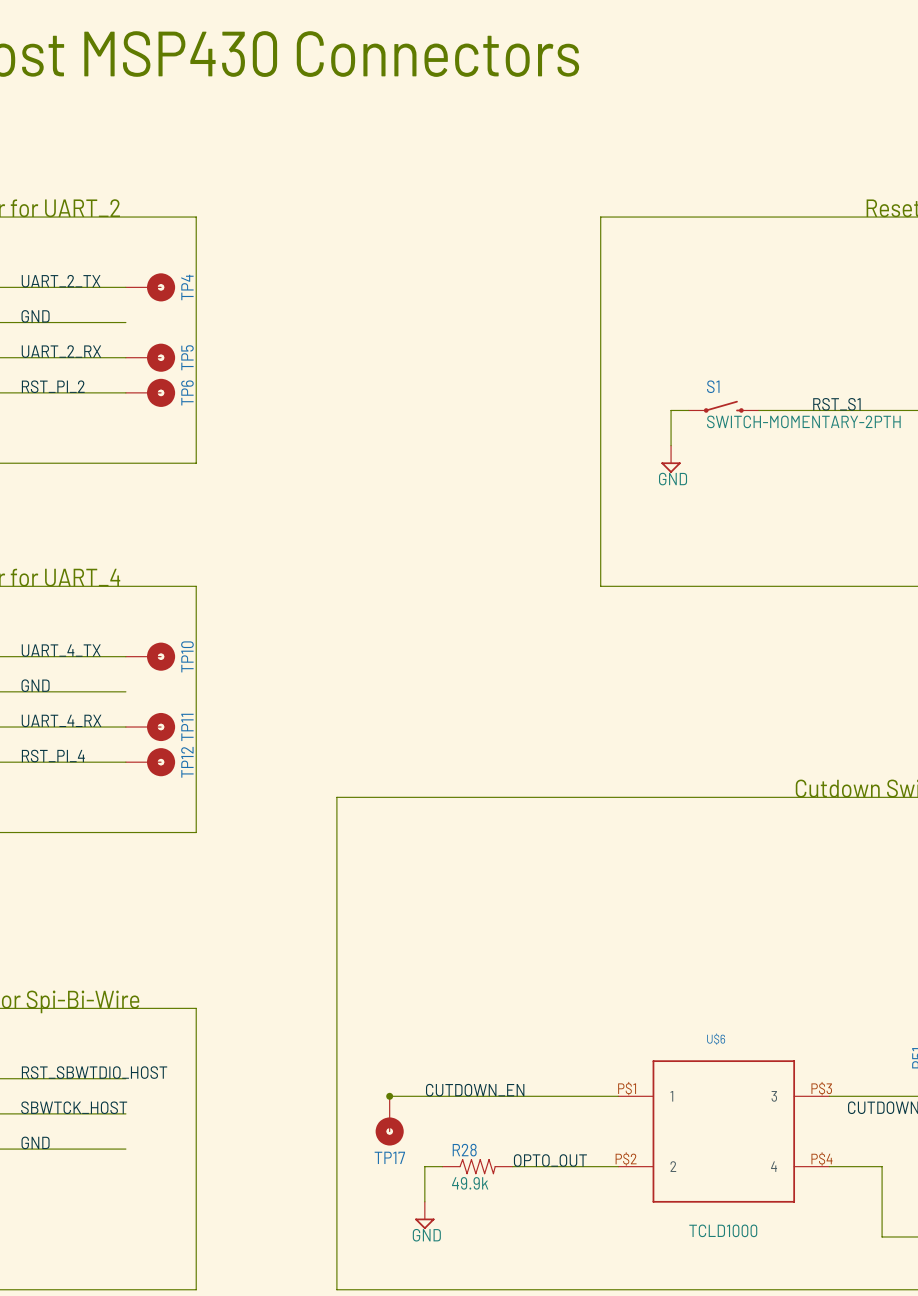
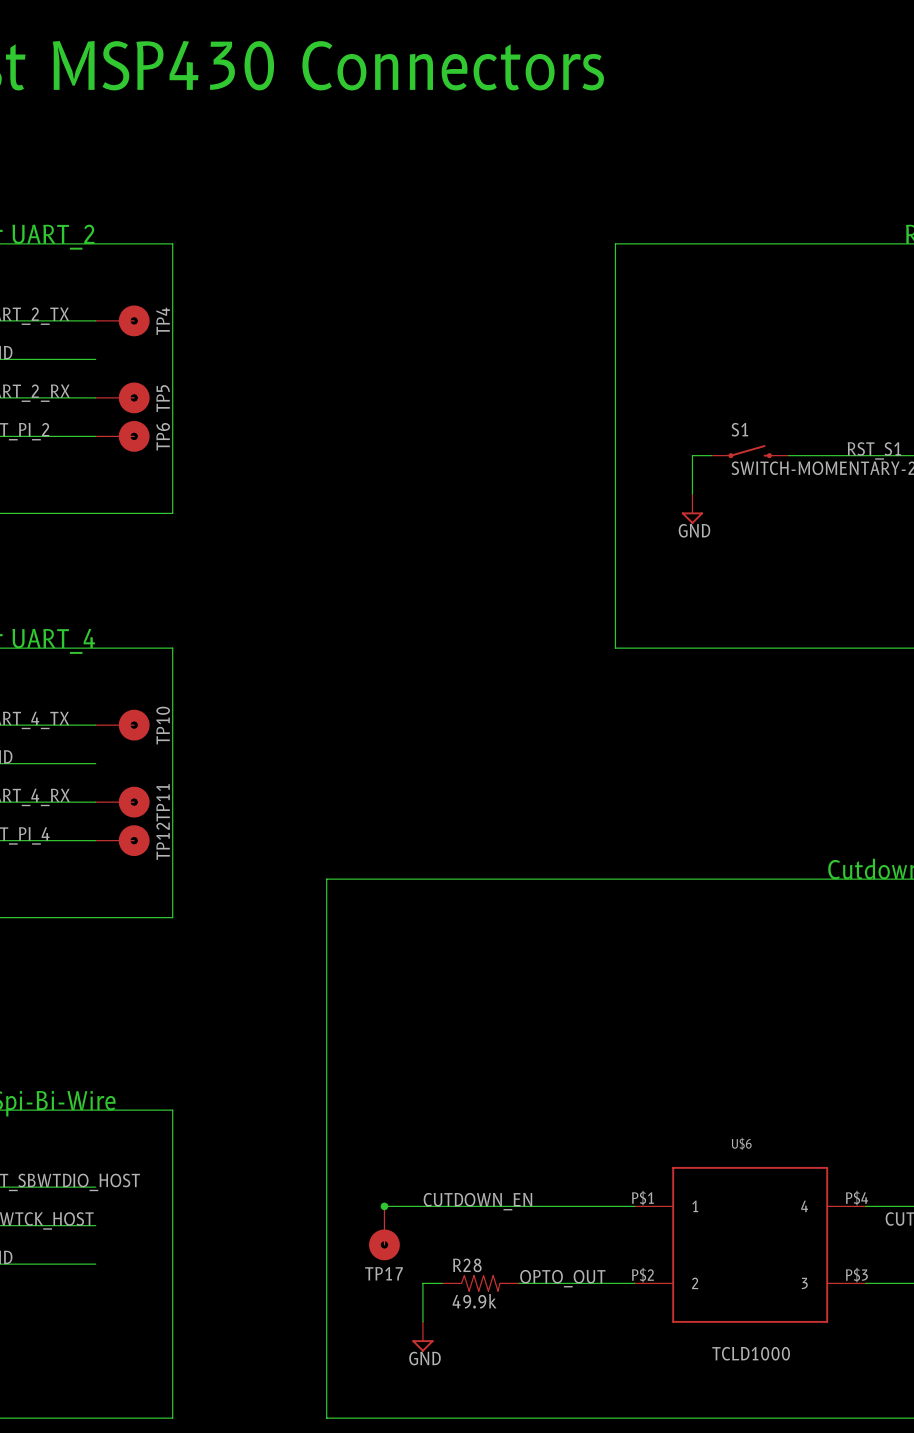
U$6 pin number: P$3 (821, 1088) -> P$4 (857, 1198)
U$6 pin name: 3 (774, 1096) -> 4 (804, 1206)
U$6 pin number: P$4 (821, 1158) -> P$3 (856, 1275)
U$6 pin name: 4 (774, 1166) -> 3 (804, 1283)

